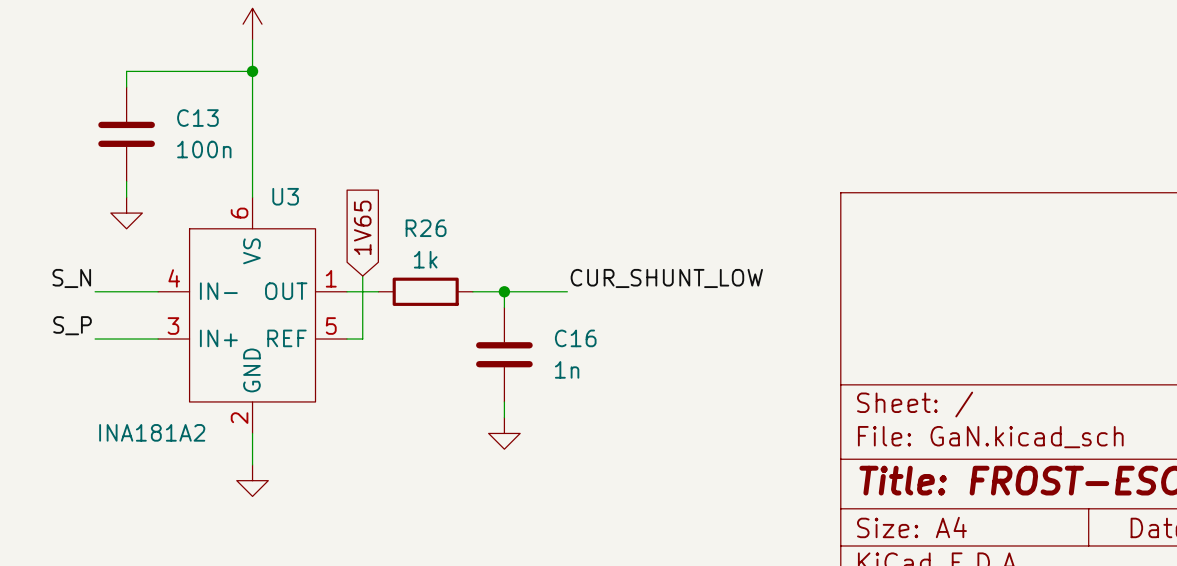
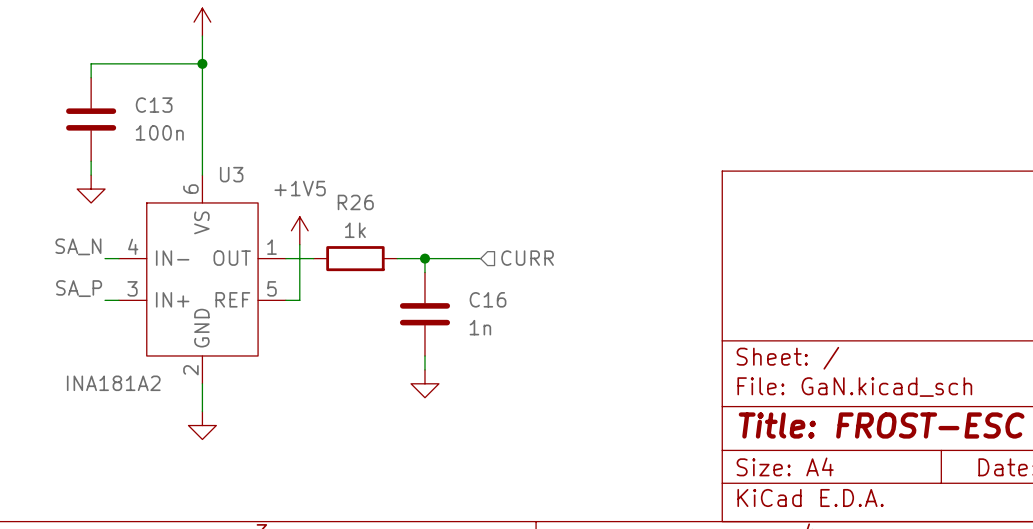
global label: 1V65 (362, 227) -> none
power symbol: none -> +1V5 (299, 230)
label: S_N (71, 278) -> SA_N (78, 246)
label: CUR_SHUNT_LOW (666, 278) -> none
wire: (95, 291) (142, 291) -> none
hierarchical label: none -> CURR (527, 258)
label: S_P (72, 325) -> SA_P (79, 288)
wire: (95, 339) (142, 339) -> none

